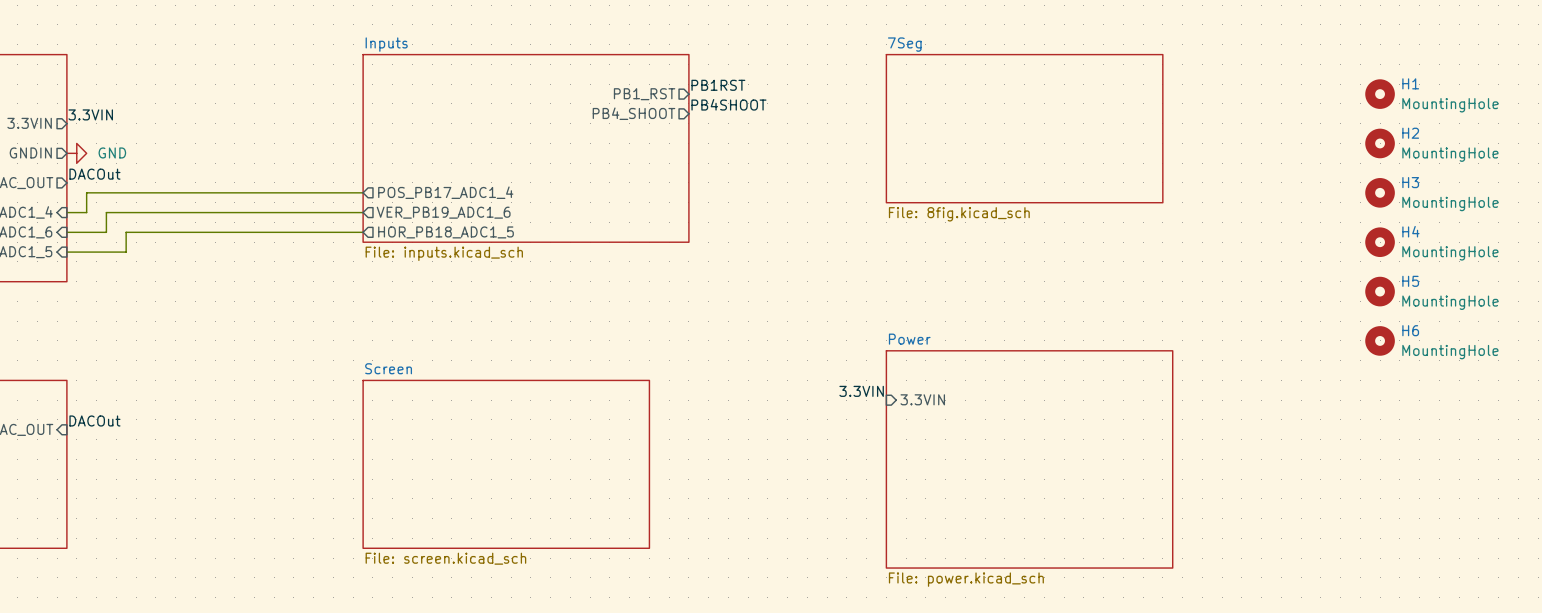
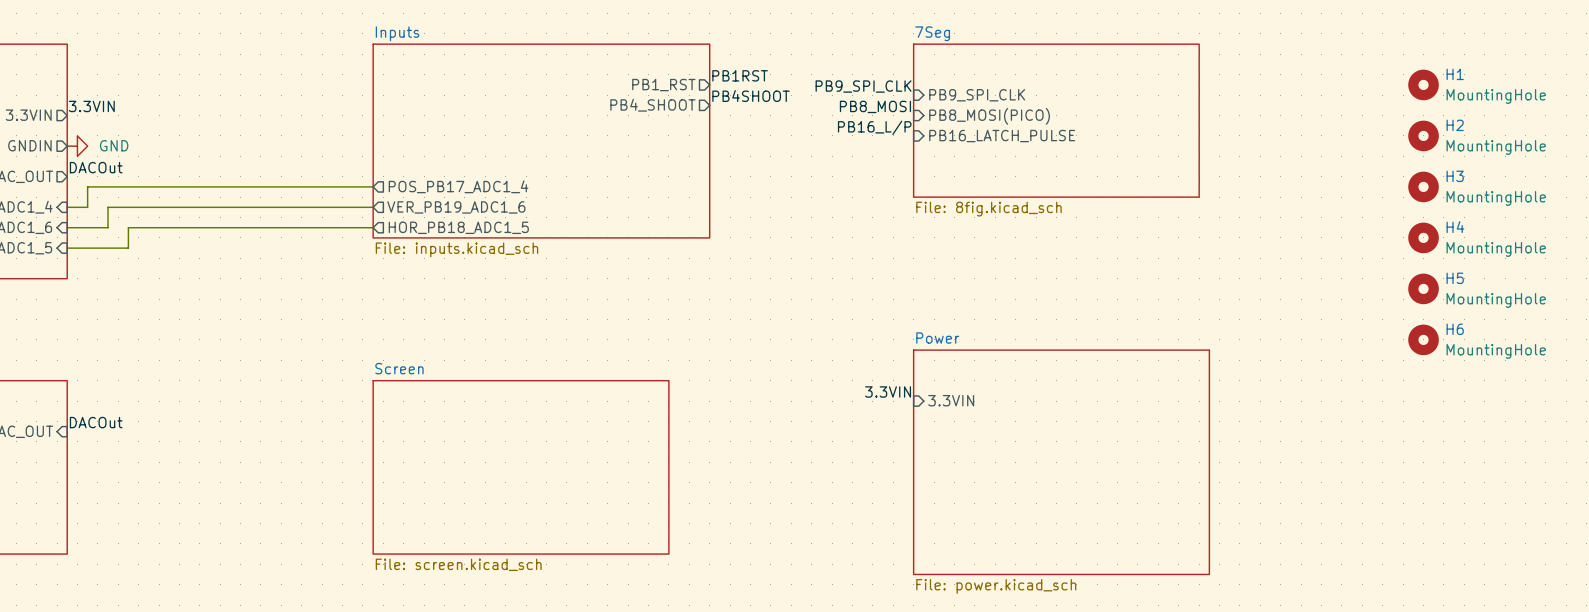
label: none -> PB9_SPI_CLK (863, 86)
sheet pin: none -> PB9_SPI_CLK (977, 95)
label: none -> PB8_MOSI (875, 106)
sheet pin: none -> PB8_MOSI(PICO) (989, 116)
label: none -> PB16_L/P (874, 127)
sheet pin: none -> PB16_LATCH_PULSE (1002, 136)

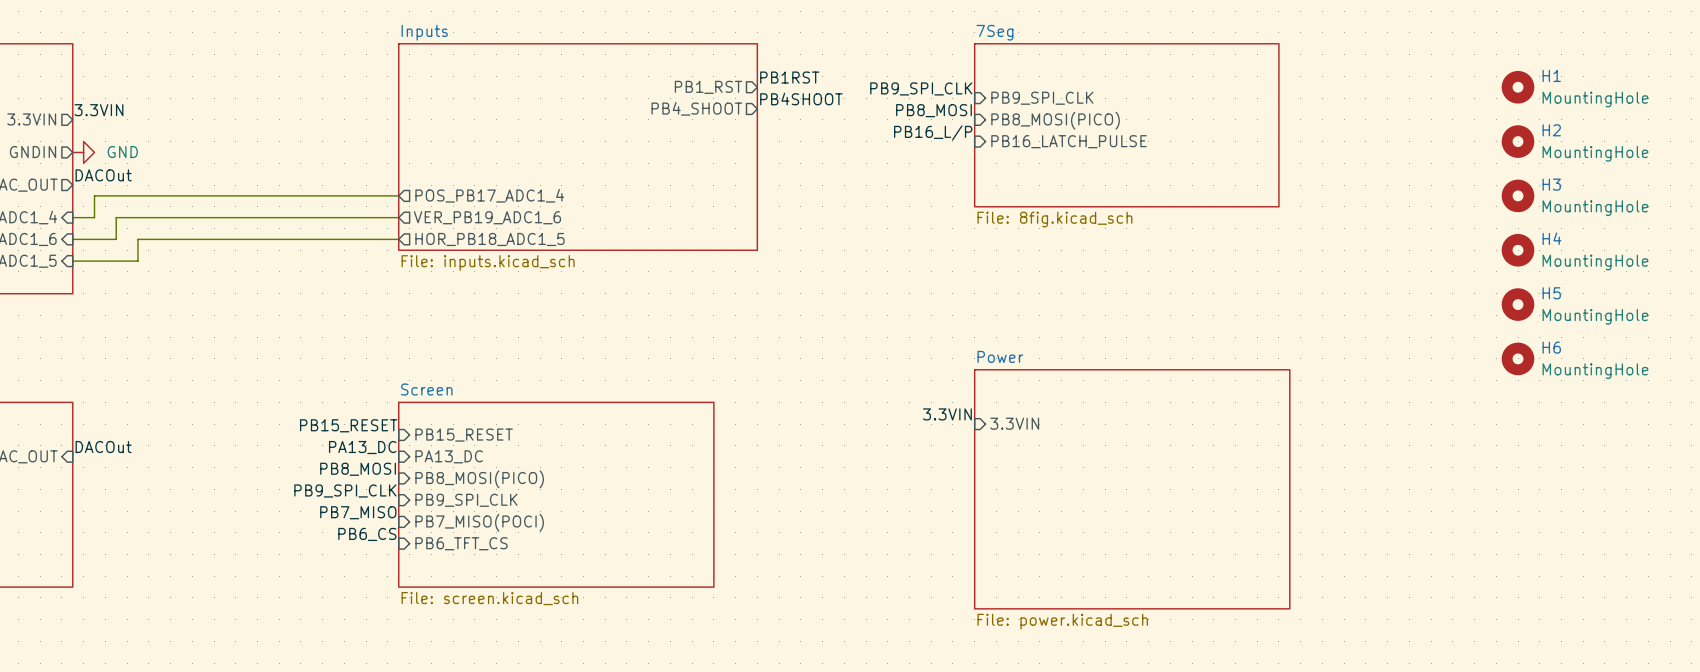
label: none -> PB15_RESET (348, 425)
sheet pin: none -> PB15_RESET (464, 435)
label: none -> PA13_DC (362, 447)
sheet pin: none -> PA13_DC (449, 456)
label: none -> PB8_MOSI (358, 469)
sheet pin: none -> PB8_MOSI(PICO) (479, 479)
label: none -> PB9_SPI_CLK (345, 490)
sheet pin: none -> PB9_SPI_CLK (466, 500)
label: none -> PB7_MISO (358, 512)
sheet pin: none -> PB7_MISO(POCI) (479, 522)
label: none -> PB6_CS (367, 534)
sheet pin: none -> PB6_TFT_CS (461, 543)

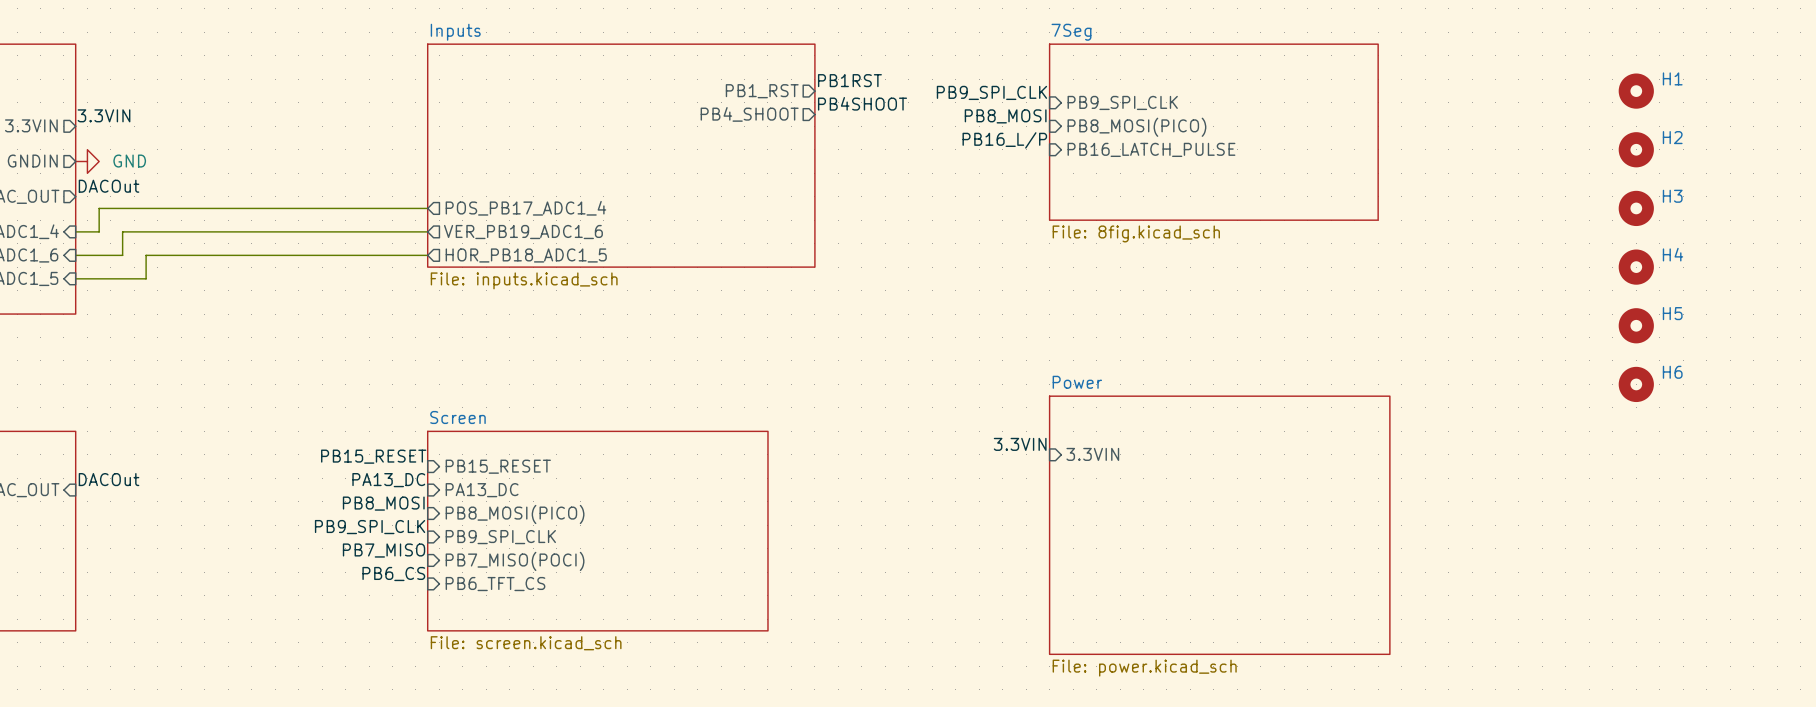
H1 value: MountingHole (1595, 99) -> none
H2 value: MountingHole (1595, 153) -> none
H3 value: MountingHole (1595, 208) -> none
H4 value: MountingHole (1595, 262) -> none
H5 value: MountingHole (1595, 316) -> none
H6 value: MountingHole (1595, 371) -> none

